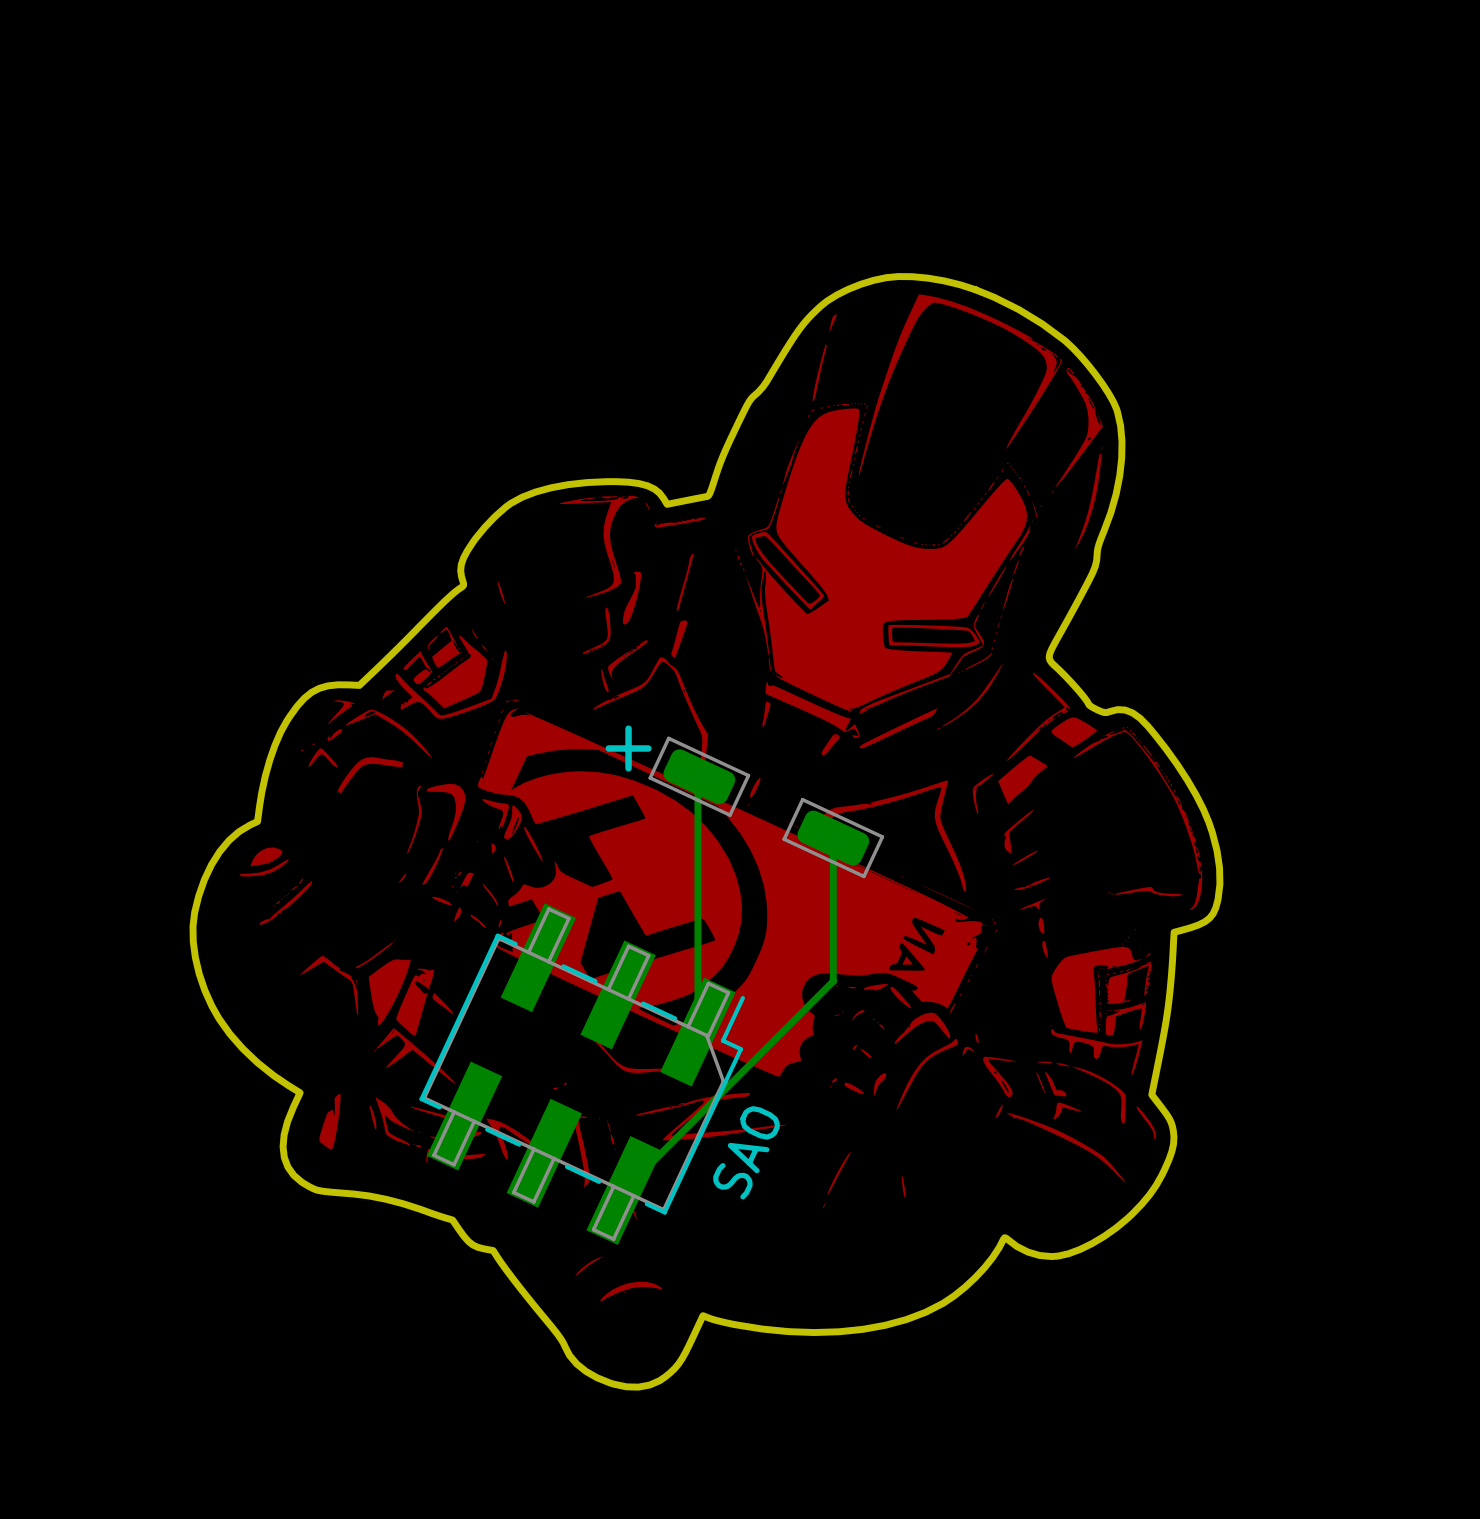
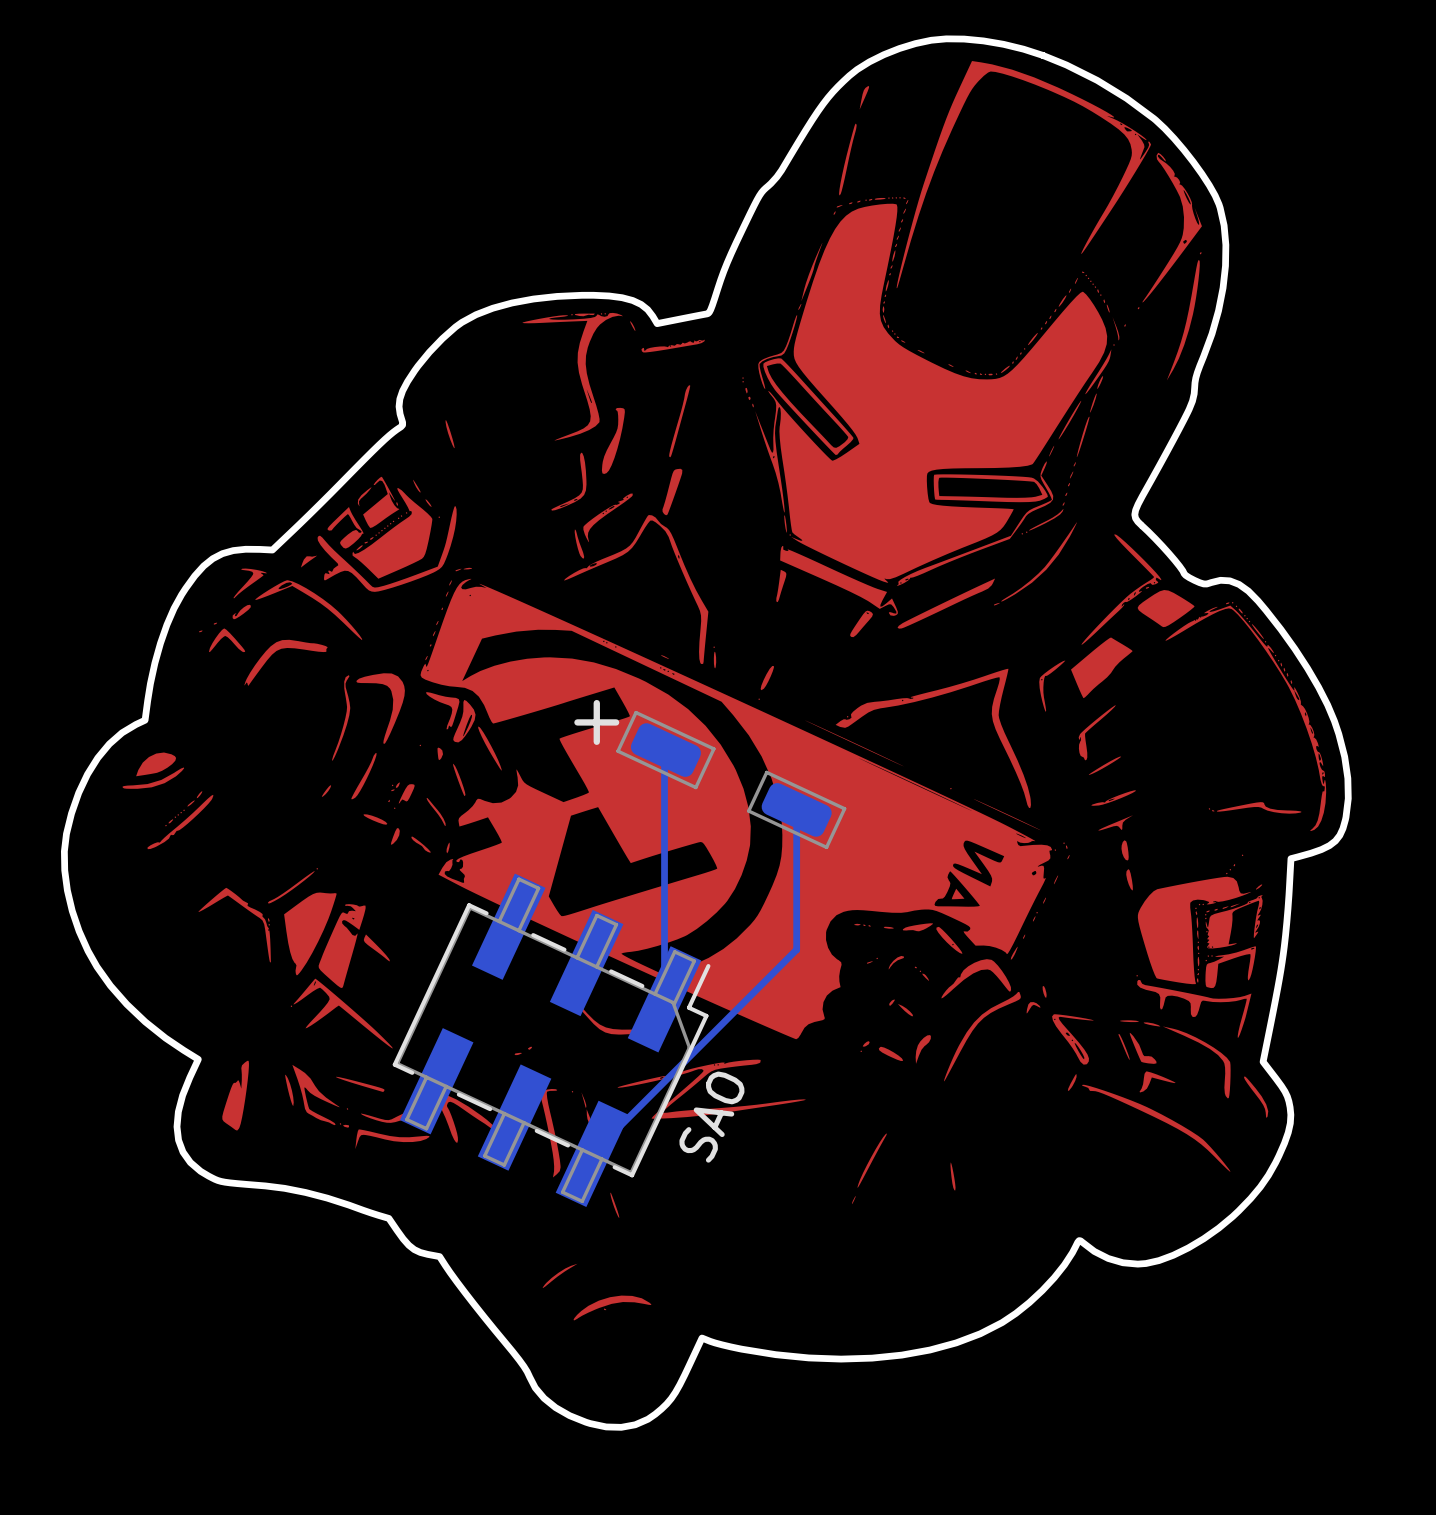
drawing: none -> [61, 35, 1352, 1431]
drawing: [189, 273, 1224, 1391] -> none

